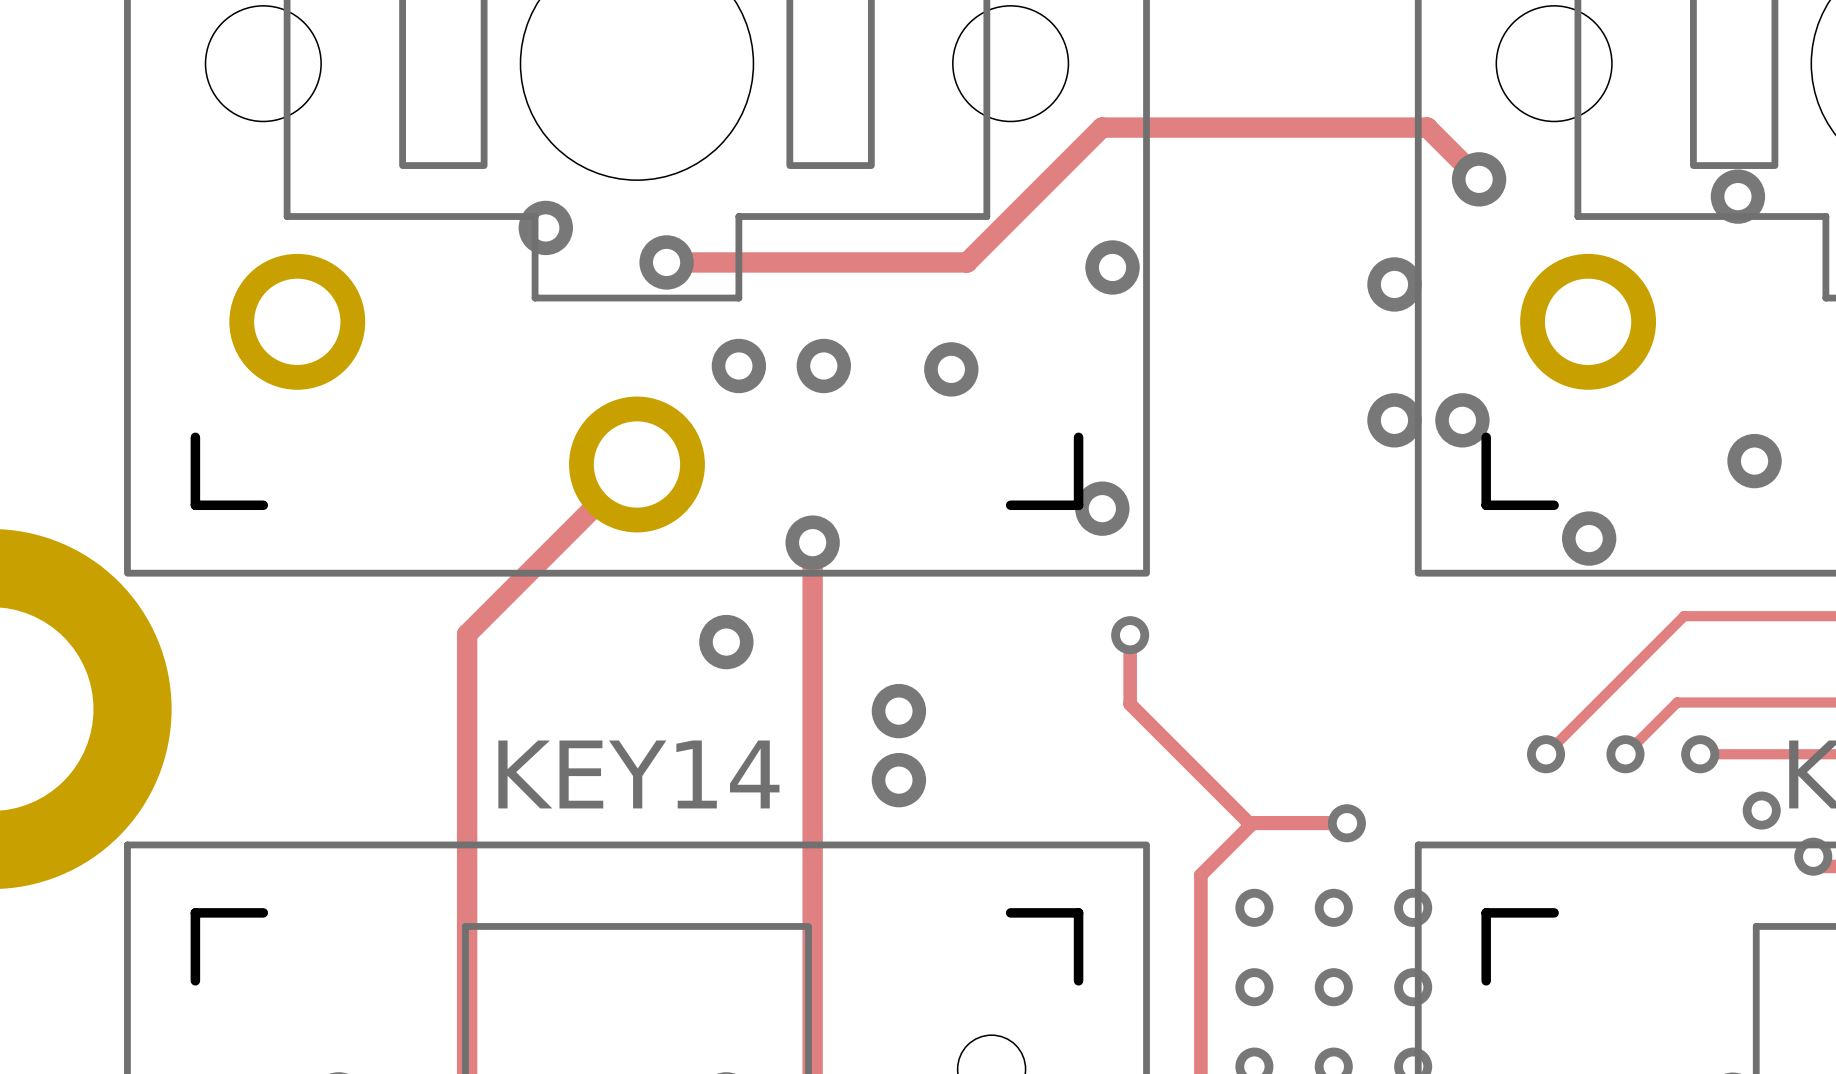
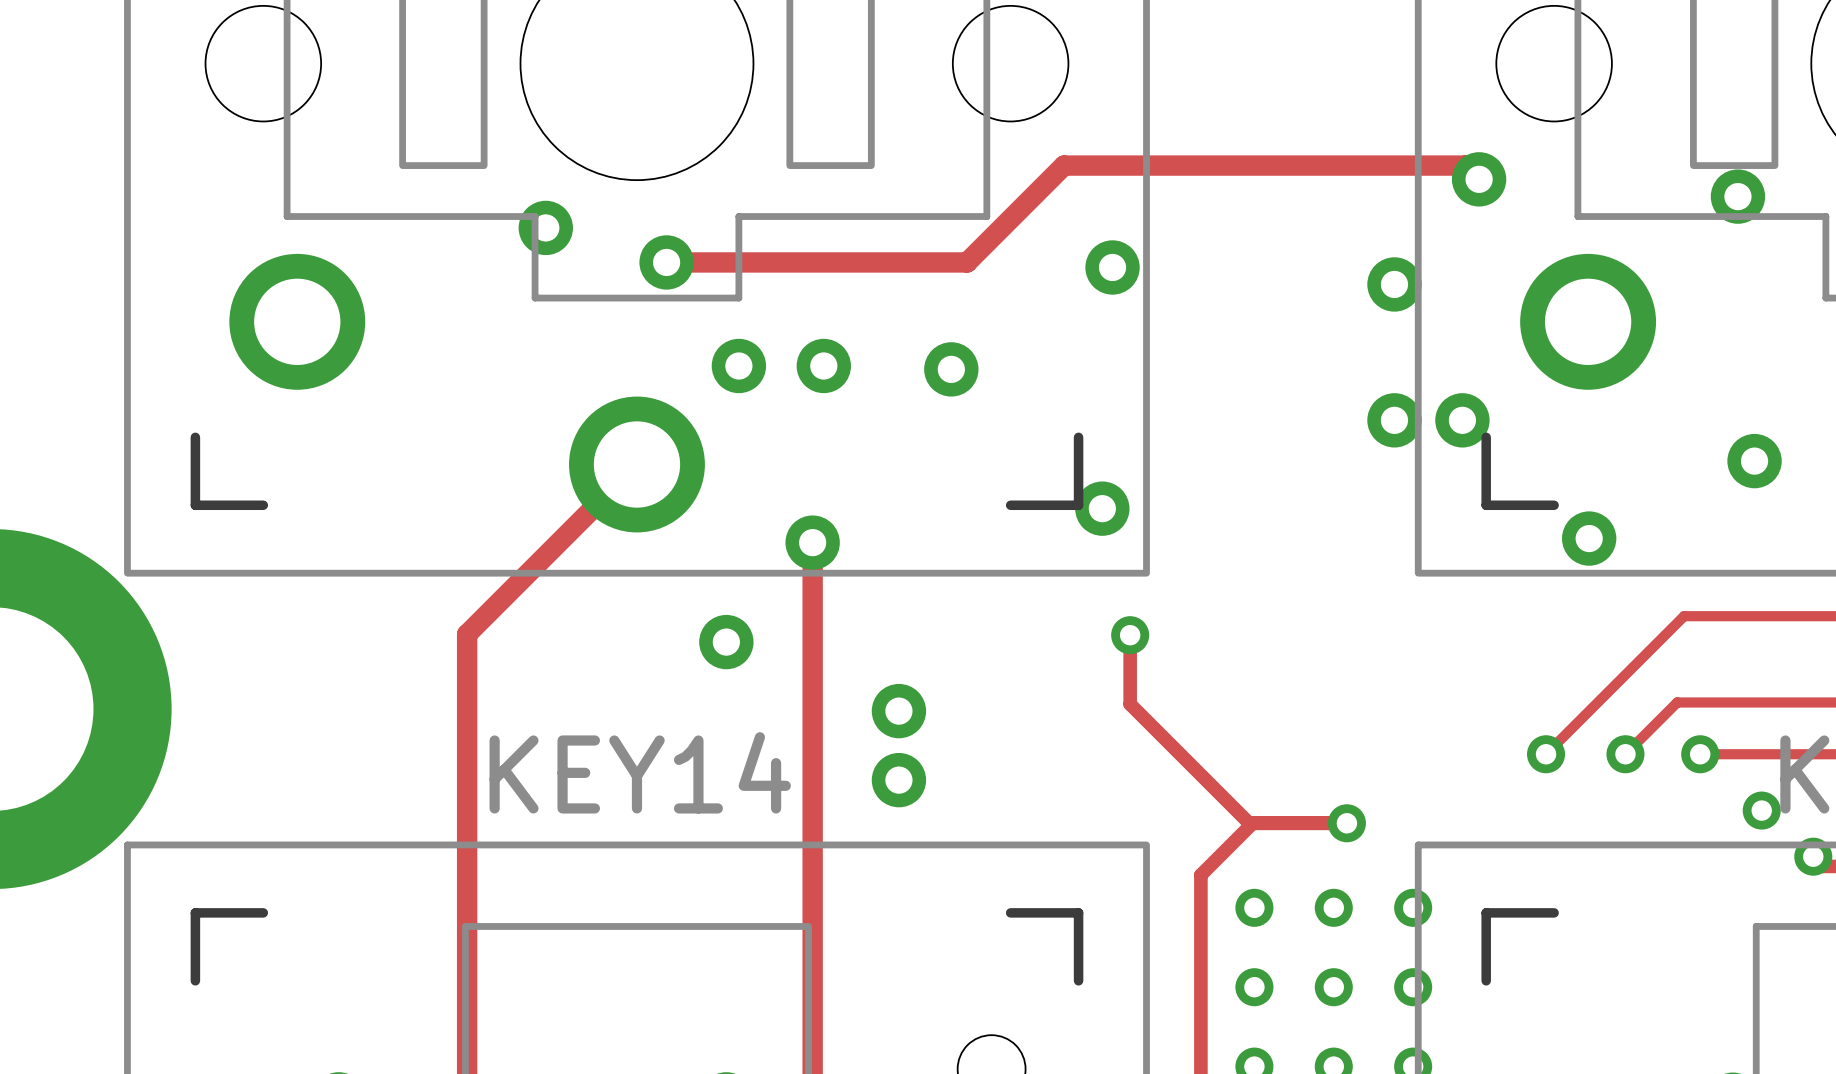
track: (1064, 165) (1102, 127) (1427, 127) (1465, 165) -> (1064, 165) (1465, 165)

